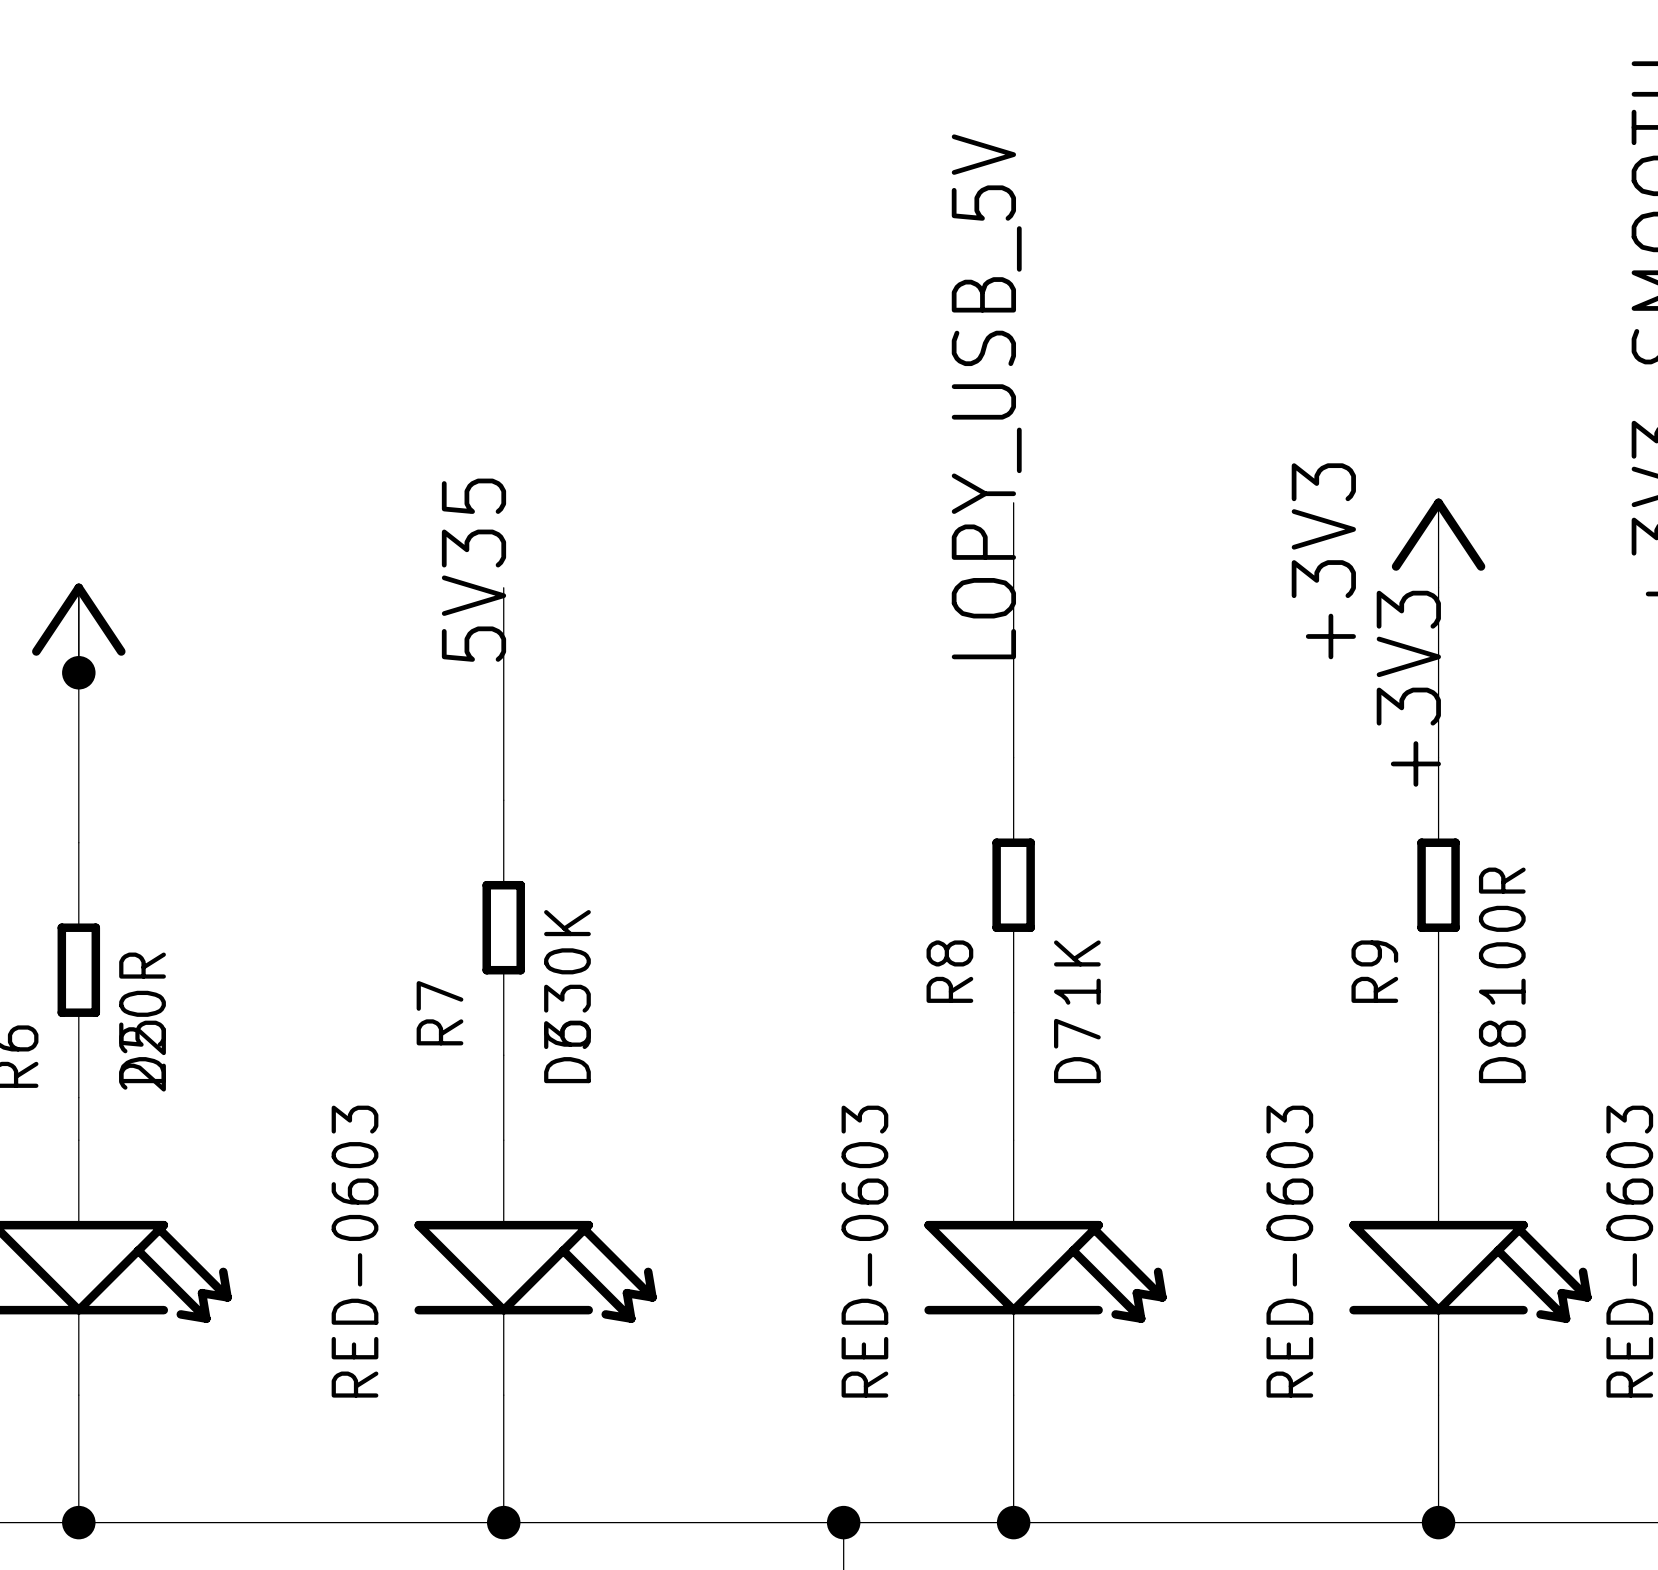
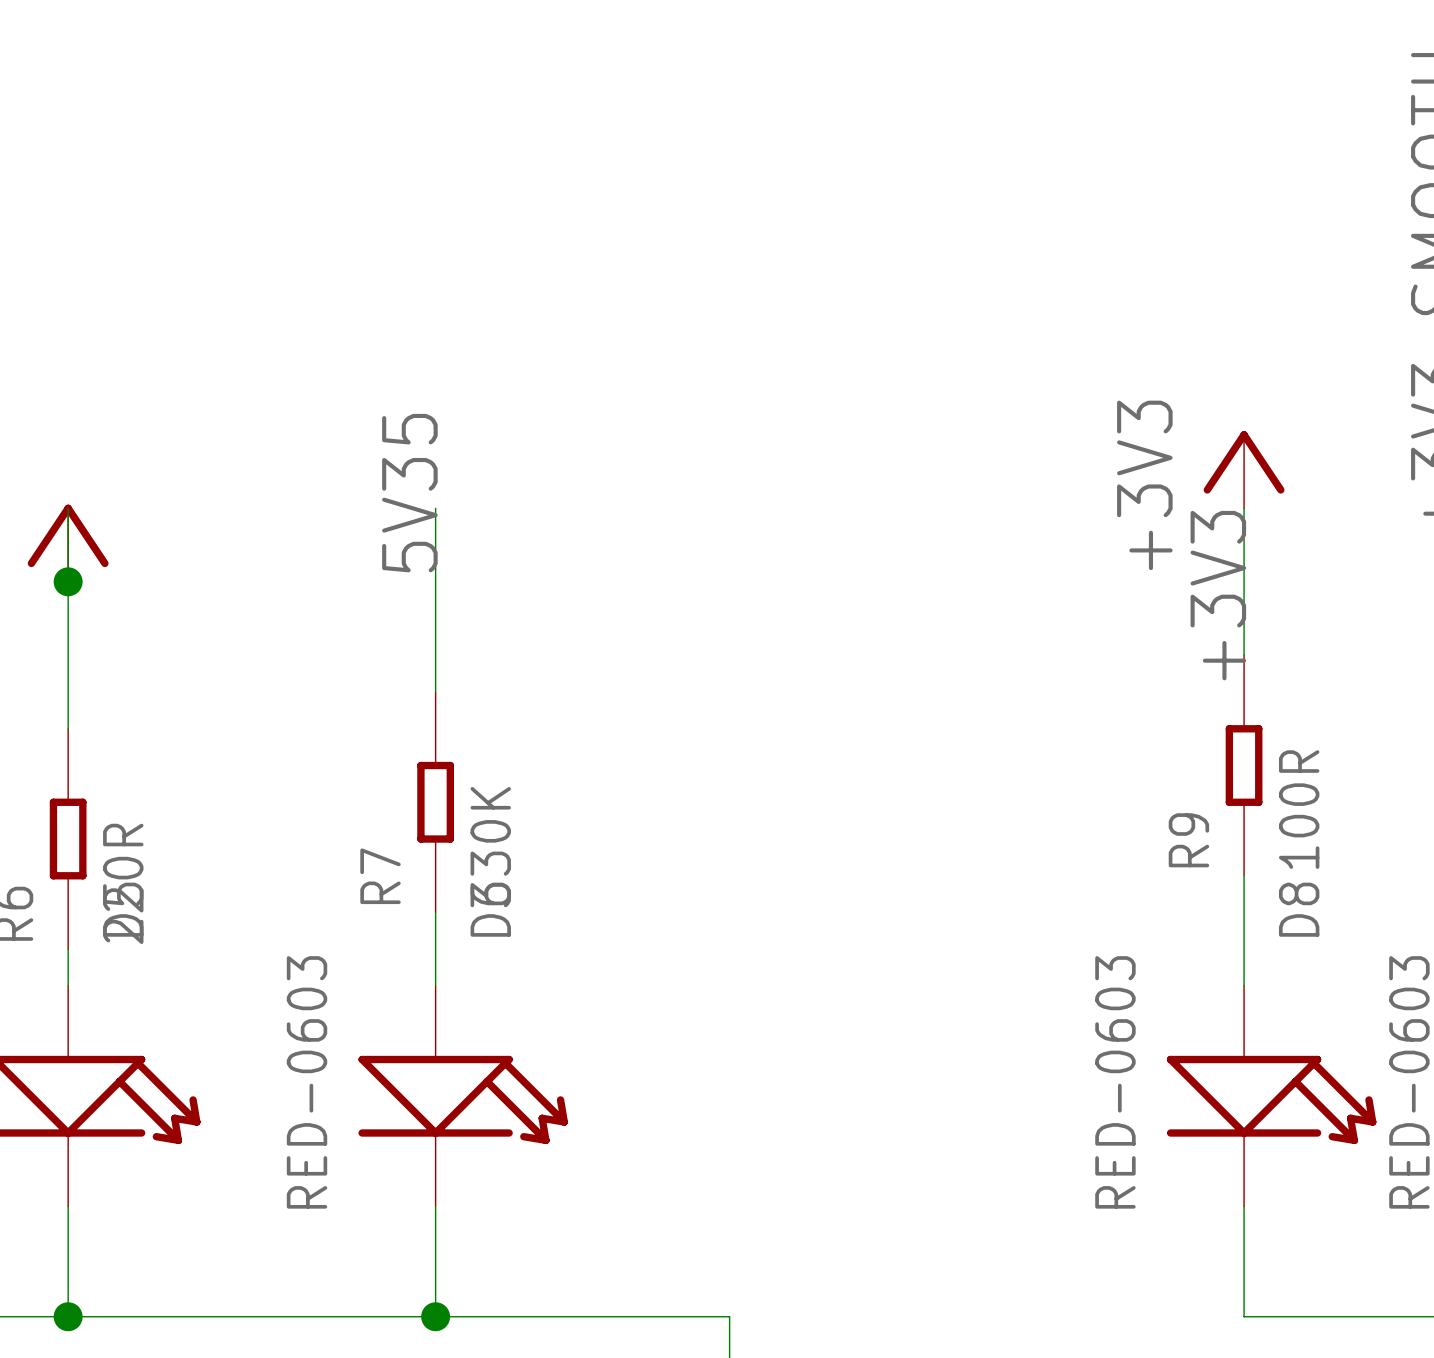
label: LOPY_USB_5V (986, 396) -> none
wire: (1013, 502) (1013, 757) -> none
R8: 1K (1013, 885) -> none
wire: (1013, 1012) (1013, 1140) -> none
D7: RED-0603 (1045, 1267) -> none
wire: (1013, 1395) (1013, 1522) -> none
wire: (843, 1522) (1438, 1522) -> none
junction: (843, 1522) -> none
junction: (1013, 1522) -> none
junction: (1438, 1522) -> none

